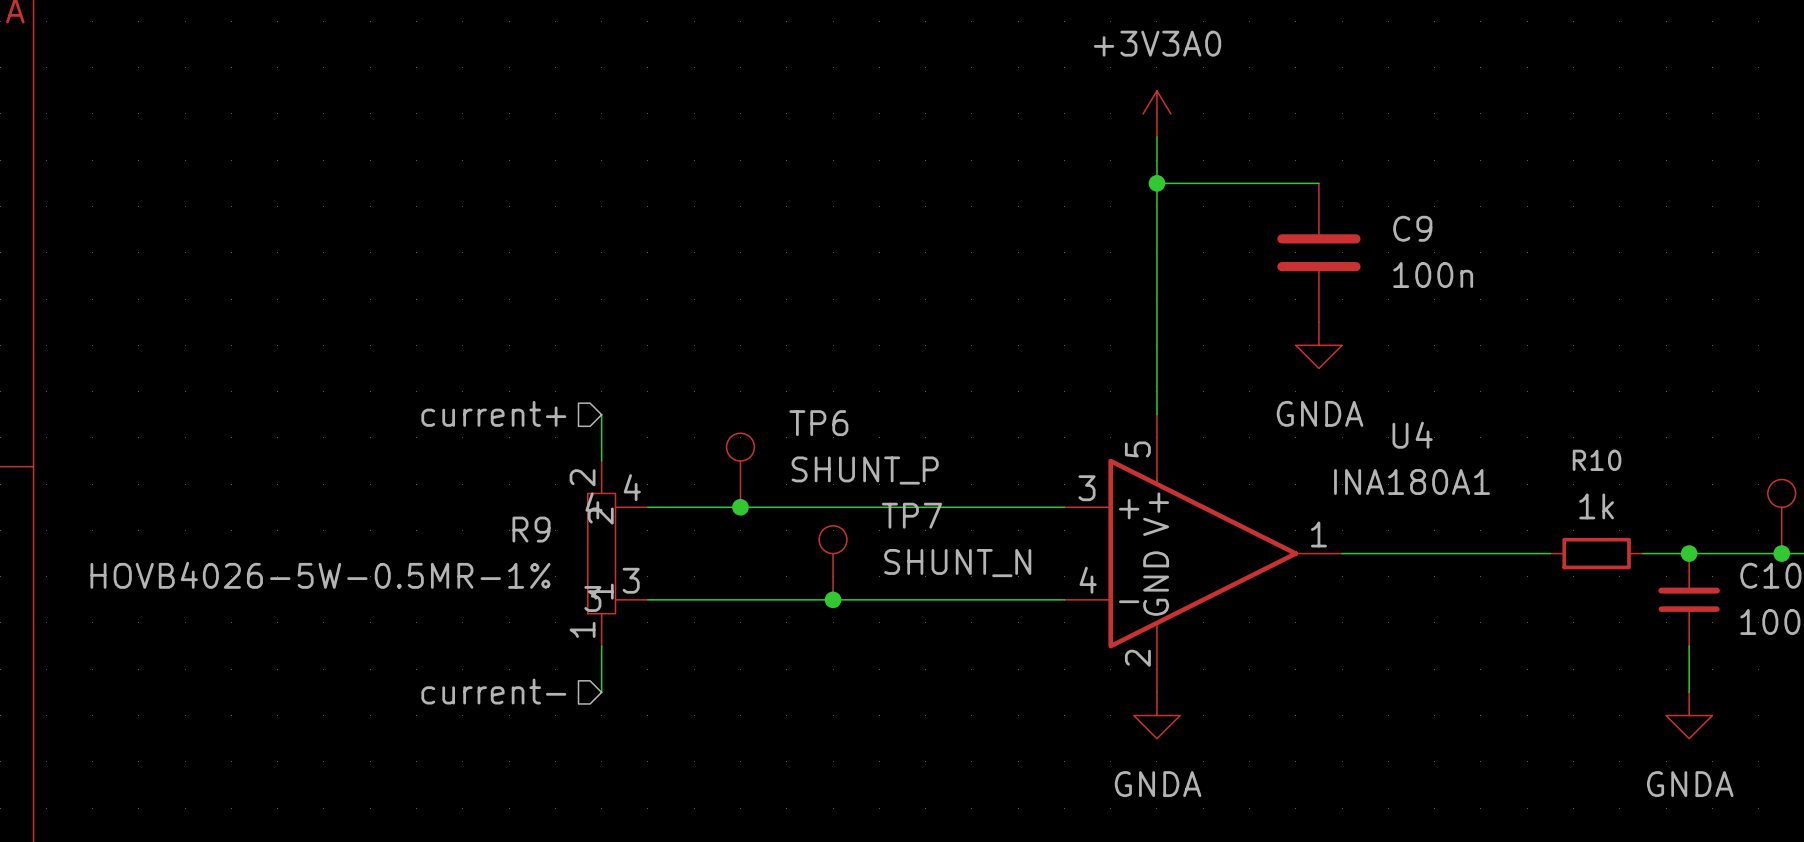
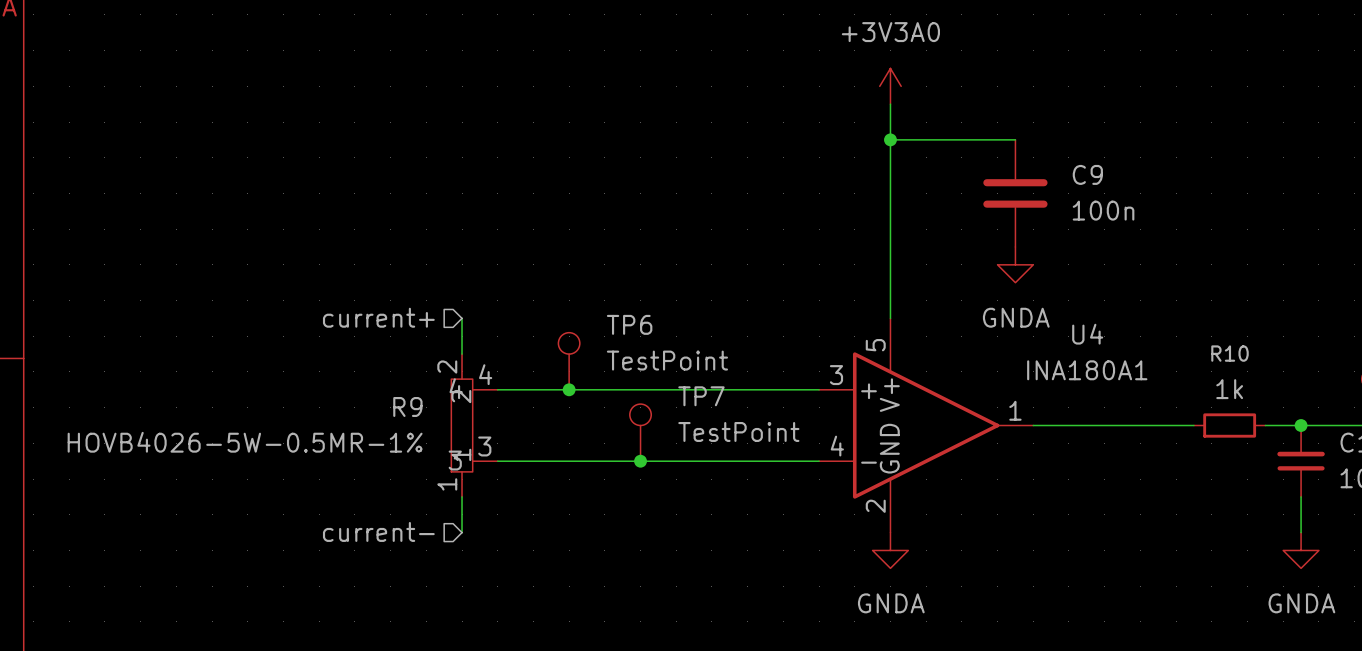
TP6 value: SHUNT_P (865, 470) -> TestPoint (667, 360)
TP7 value: SHUNT_N (957, 563) -> TestPoint (738, 431)

